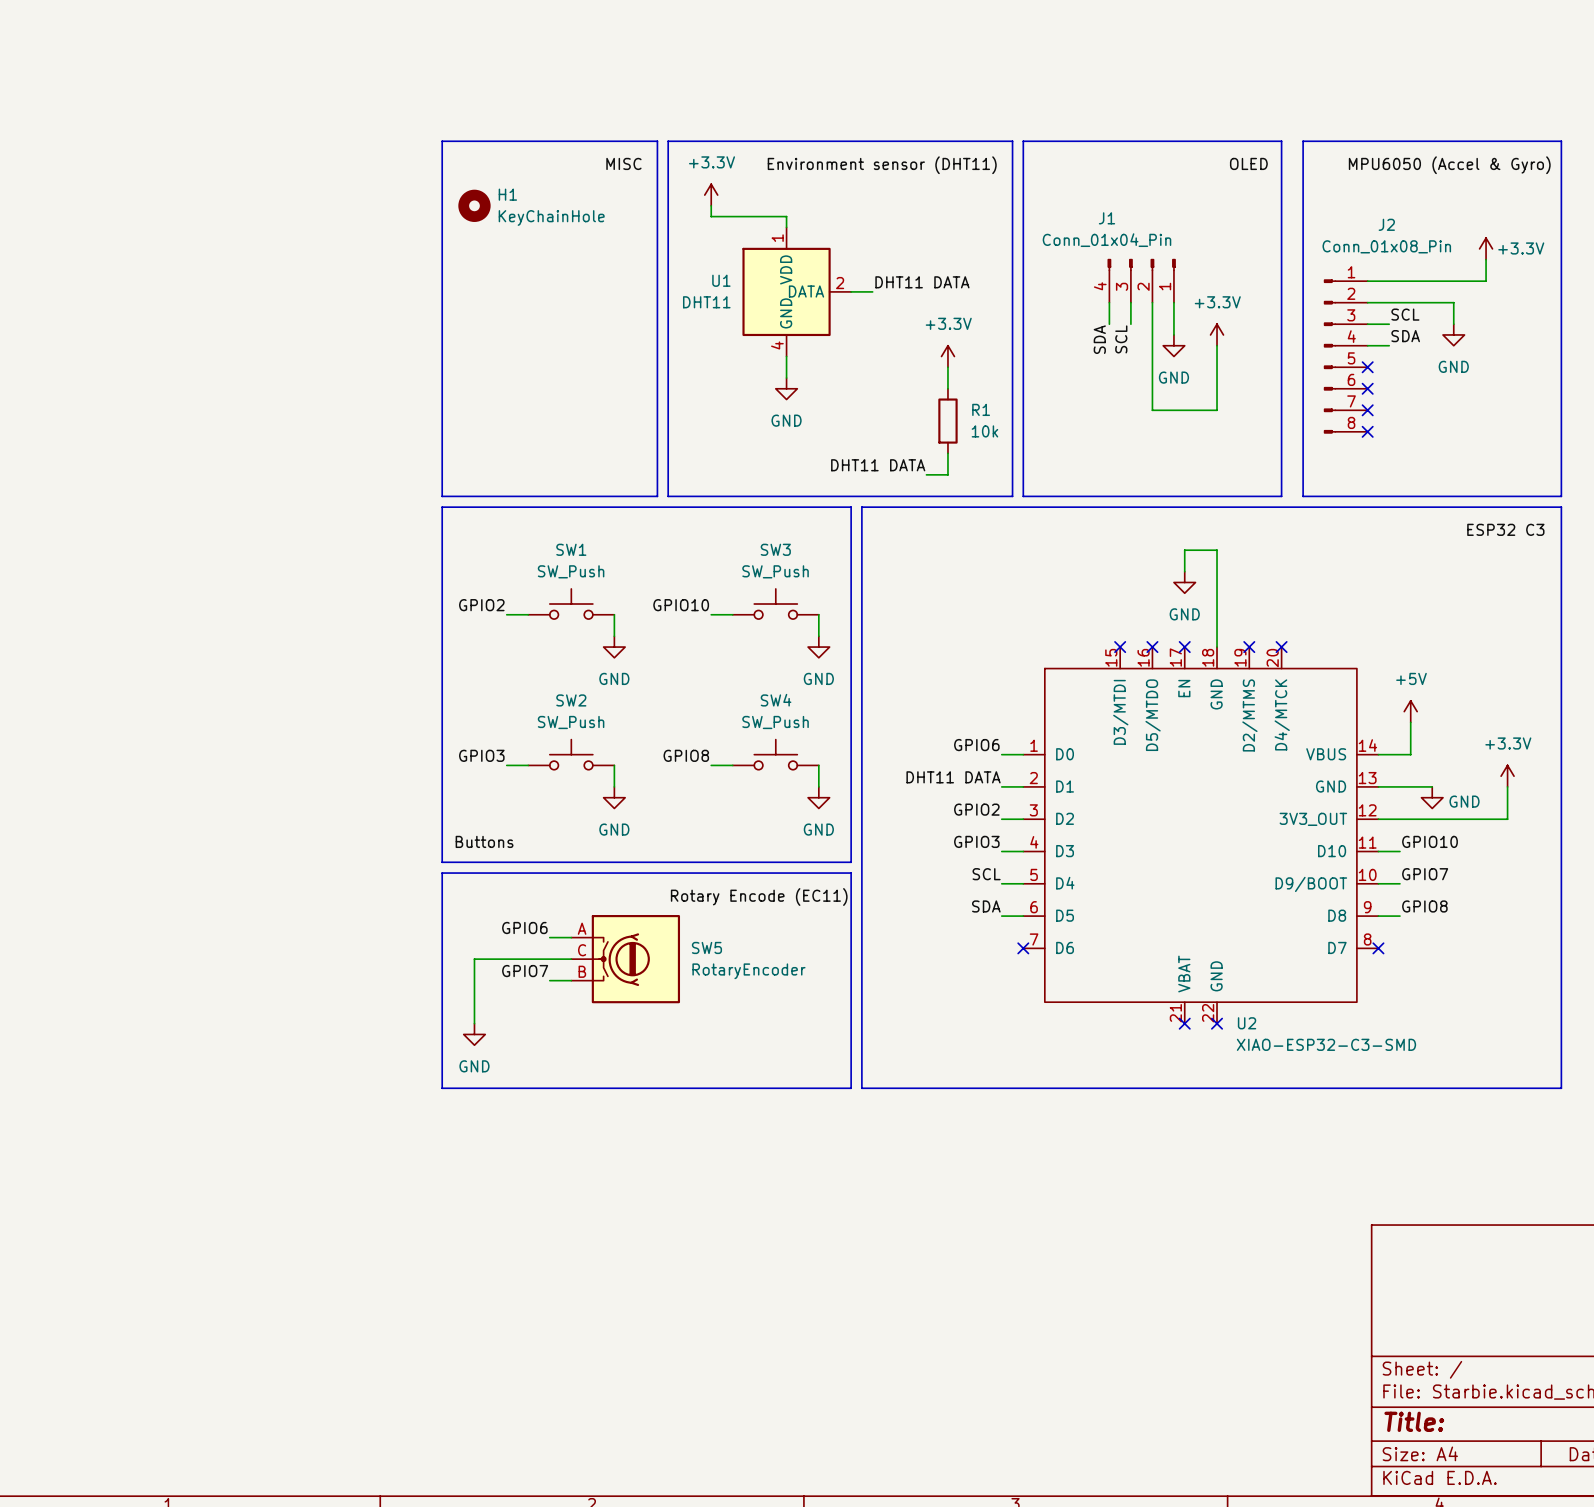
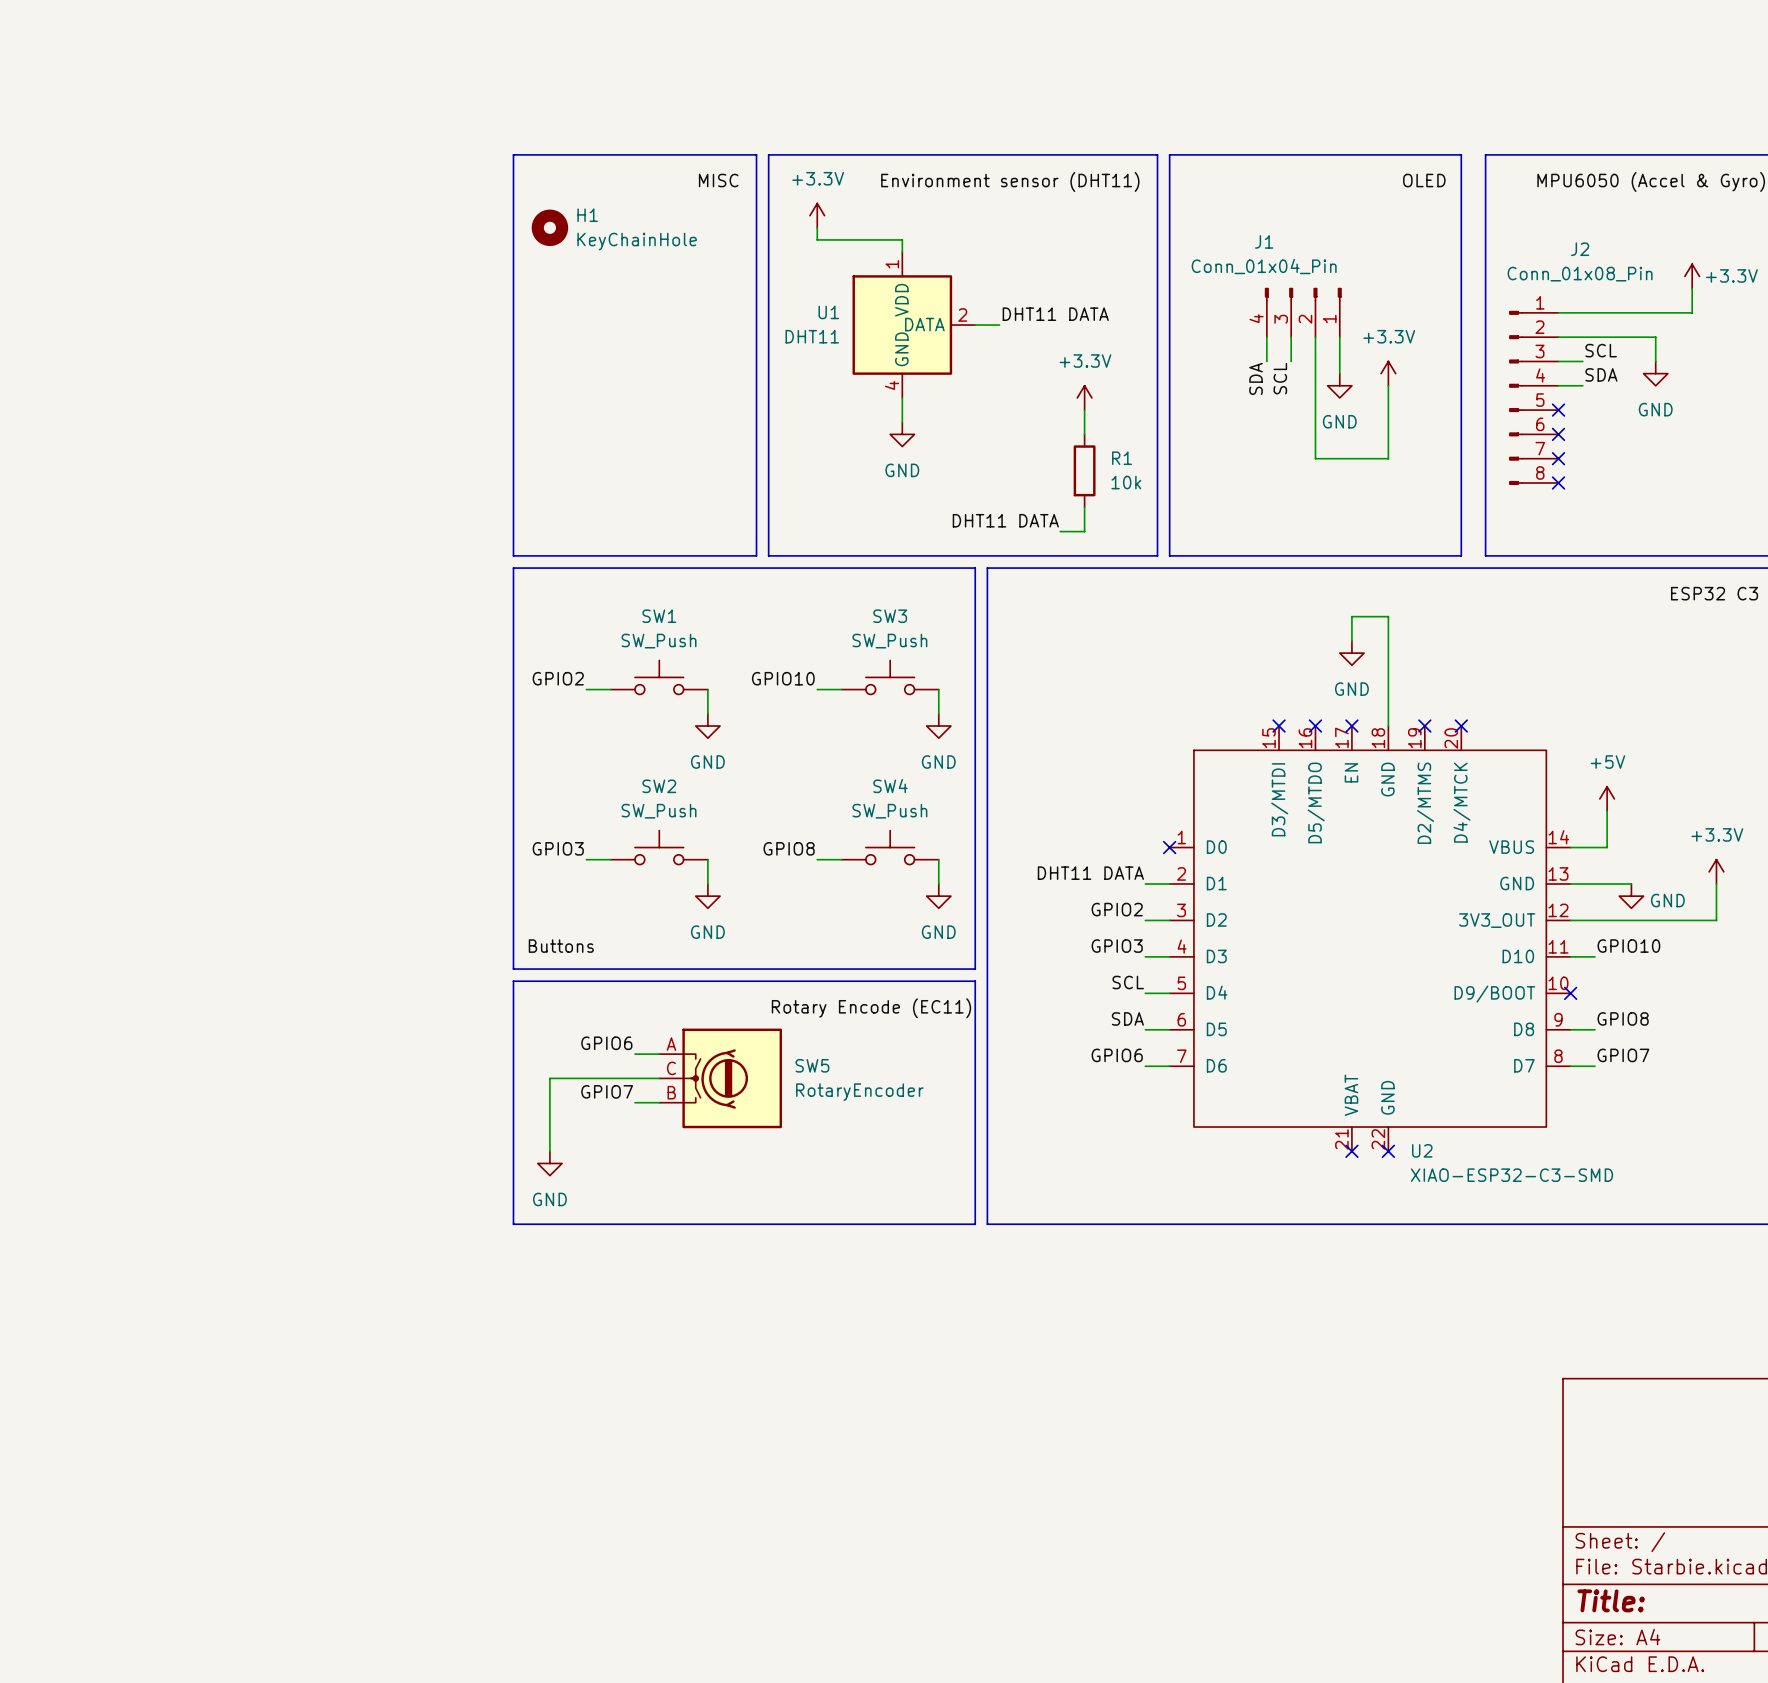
label position: GPIO6 (976, 745) -> GPIO6 (1117, 1055)
wire: (1001, 754) (1023, 754) -> (1145, 1066) (1169, 1066)
no-connect mark: none -> (1169, 847)
label position: GPIO7 (1425, 874) -> GPIO7 (1623, 1055)
wire: (1378, 883) (1399, 883) -> (1570, 1066) (1594, 1066)
no-connect mark: none -> (1570, 993)
no-connect mark: (1023, 948) -> none
no-connect mark: (1378, 948) -> none

